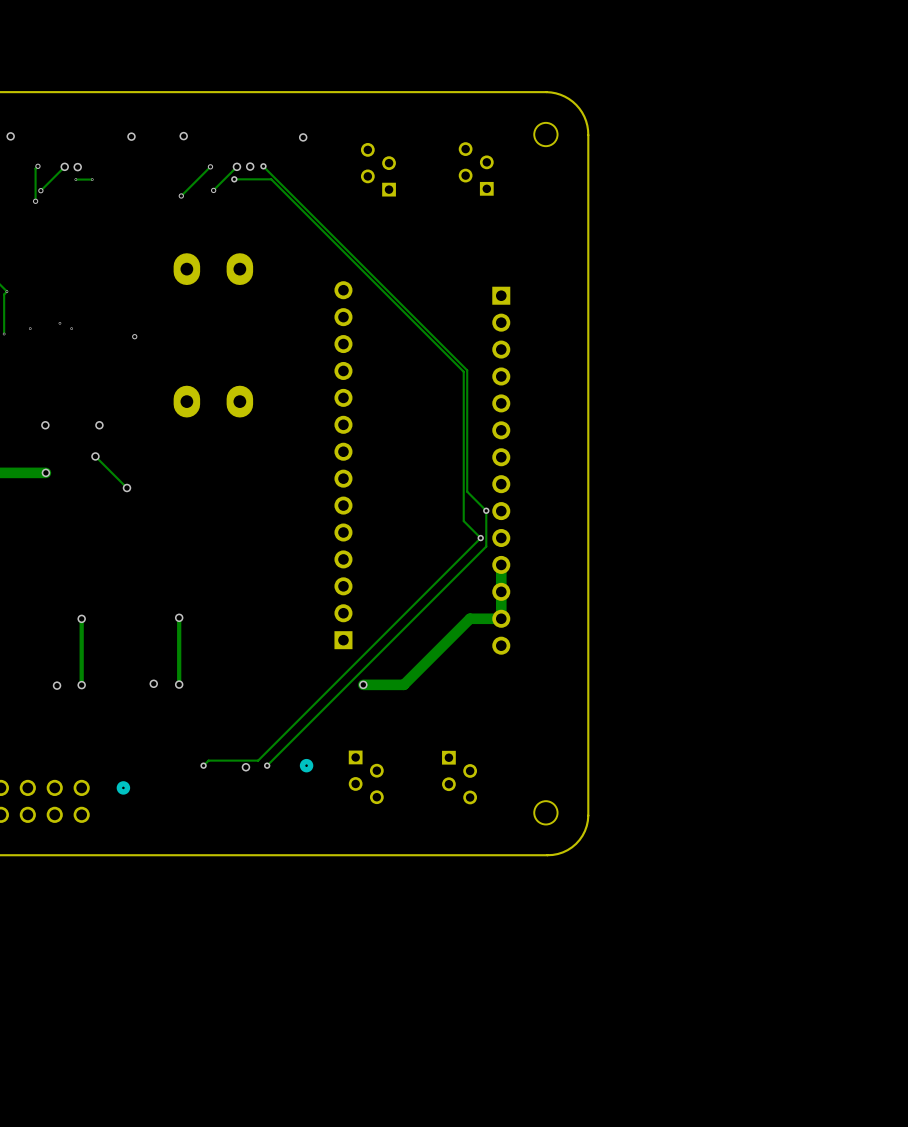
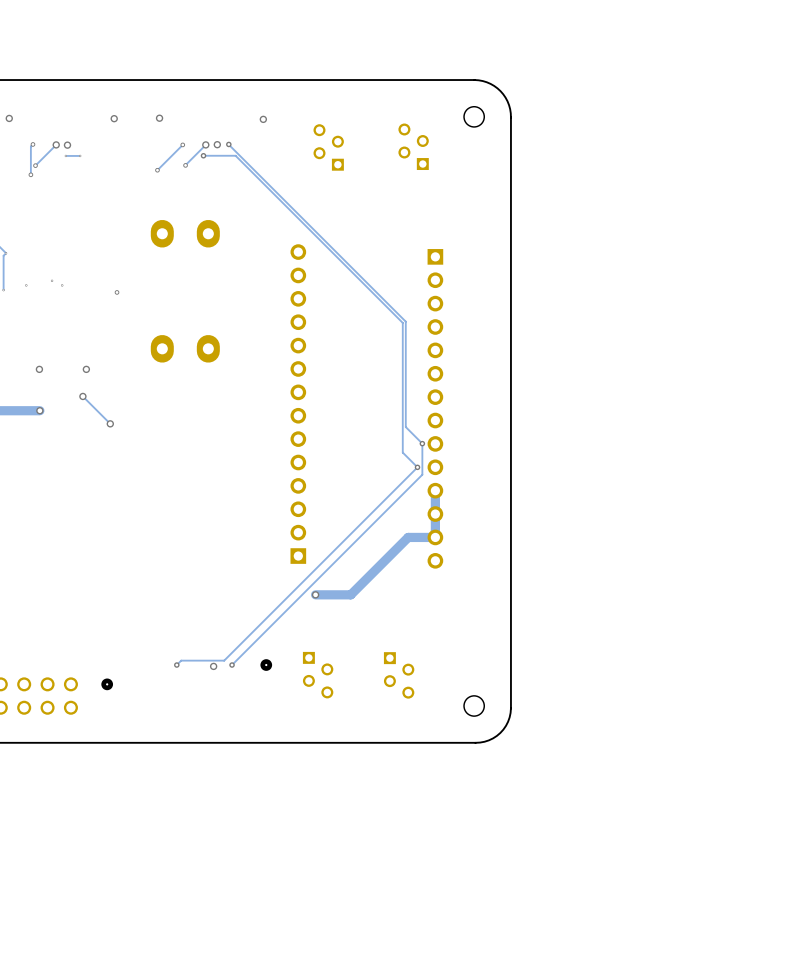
track: (179, 617) (179, 684) -> none
via: (179, 617) -> none
track: (81, 618) (81, 685) -> none
via: (81, 618) -> none
via: (153, 683) -> none
via: (179, 684) -> none
via: (57, 685) -> none
via: (81, 685) -> none

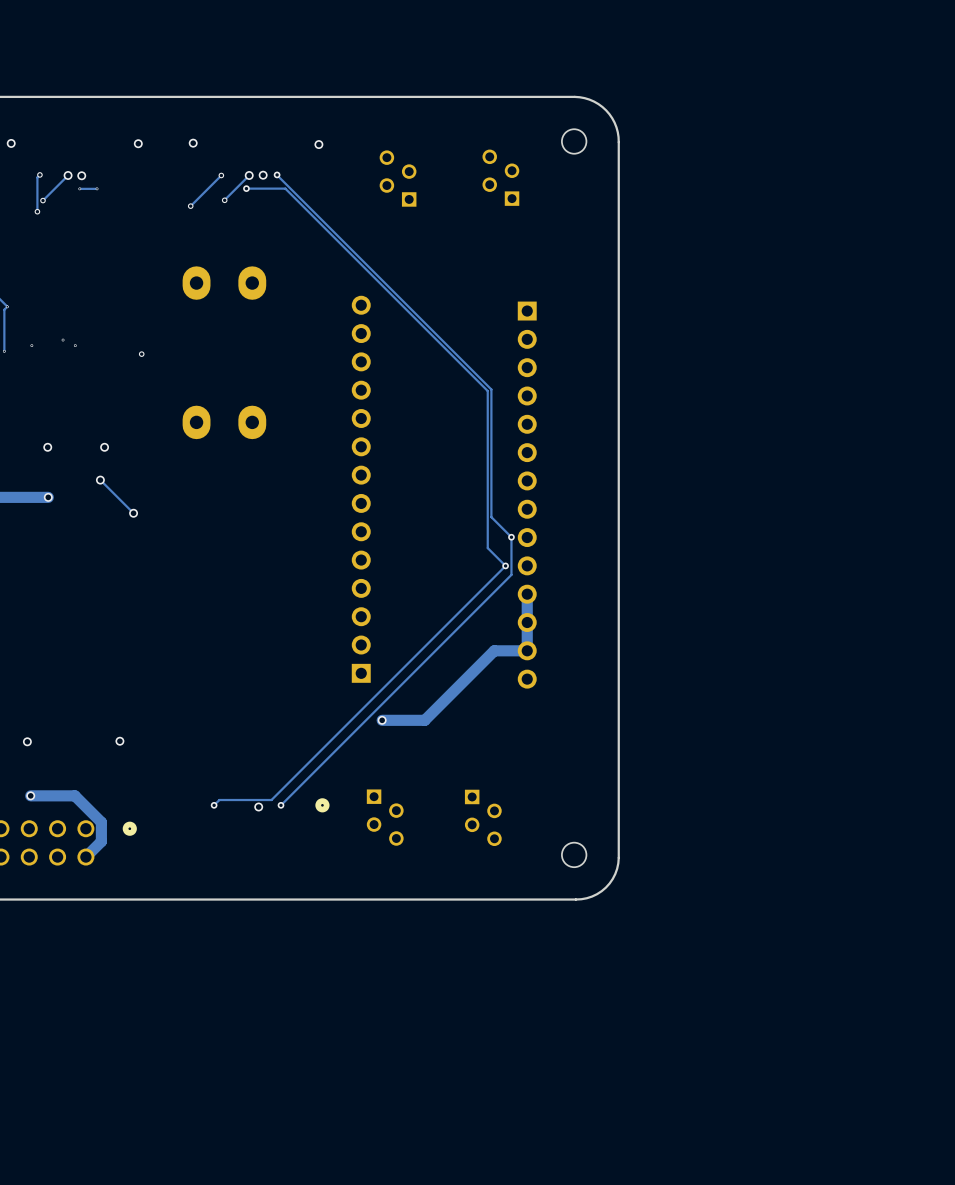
via: none -> (27, 741)
via: none -> (119, 741)
track: none -> (30, 795) (74, 795) (101, 822) (101, 841) (85, 857)
via: none -> (30, 795)

